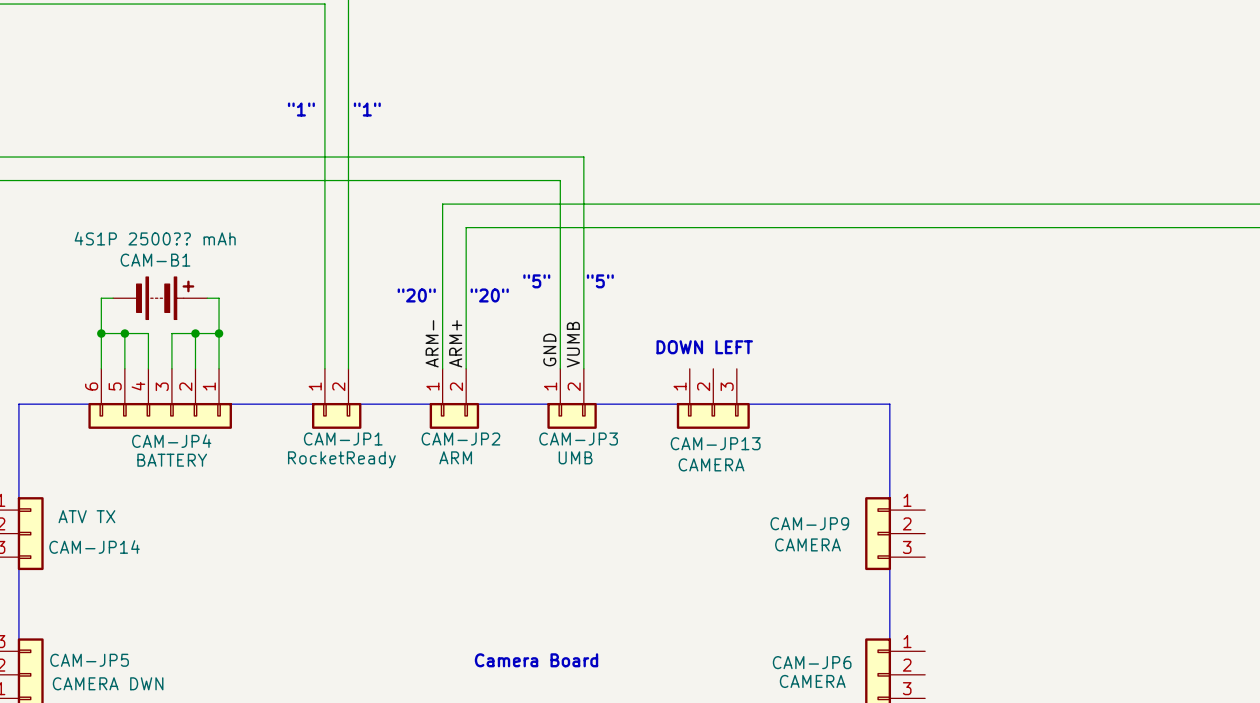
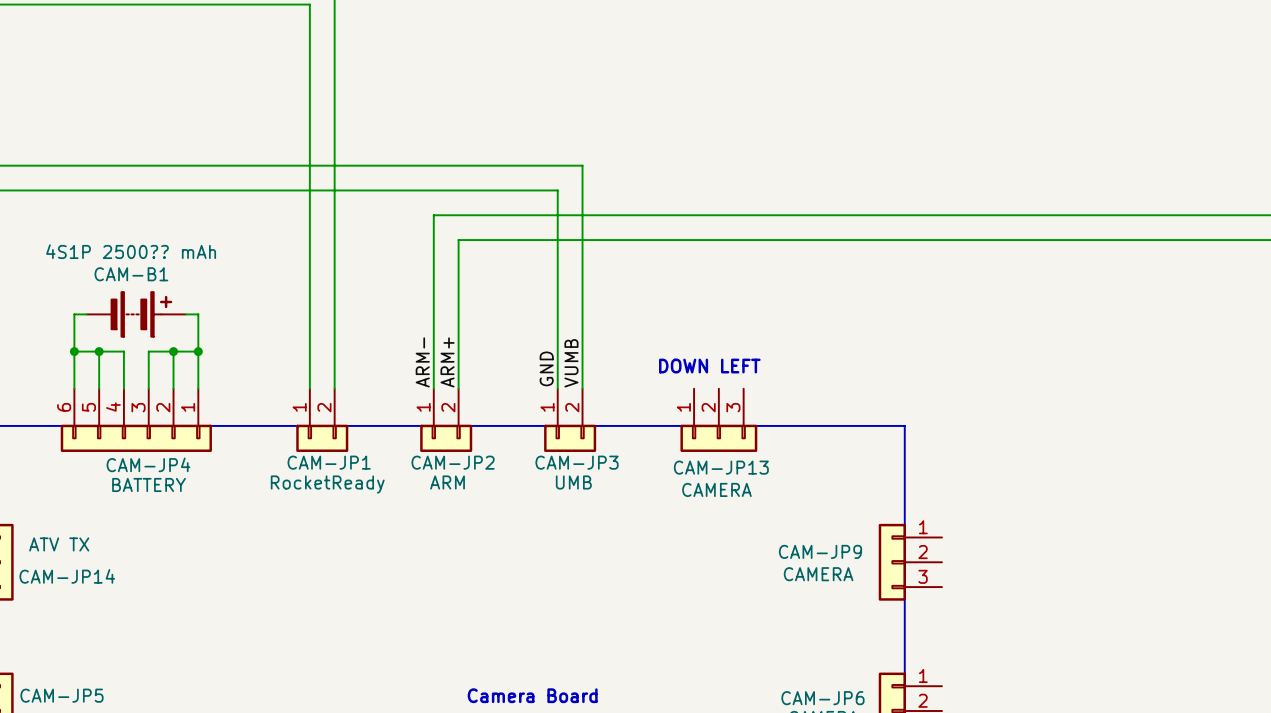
text: "1" (301, 109) -> none
text: "1" (367, 109) -> none
text: "5" (536, 281) -> none
text: "5" (600, 281) -> none
text: "20" (416, 295) -> none
text: "20" (489, 295) -> none

